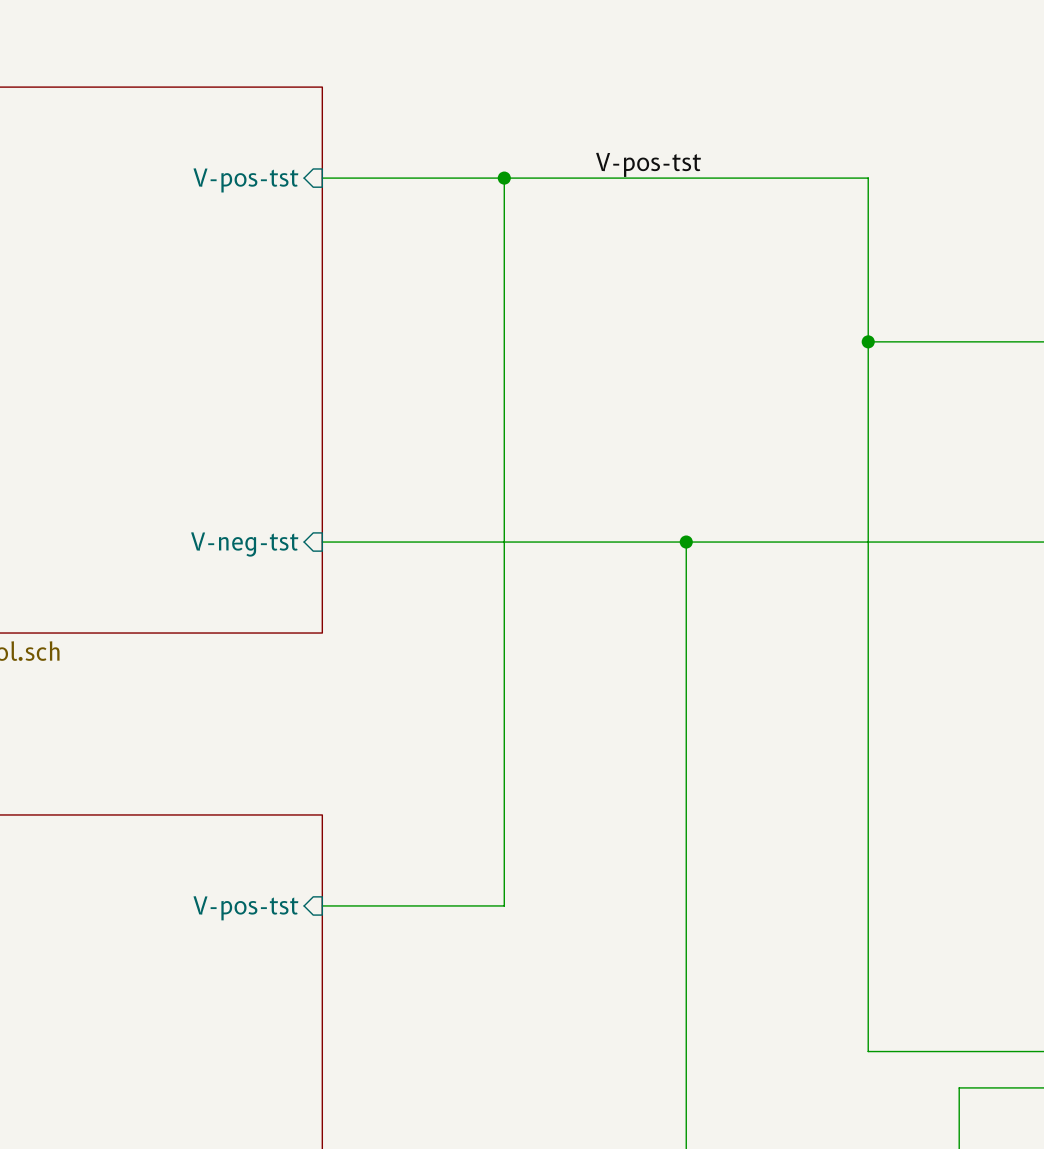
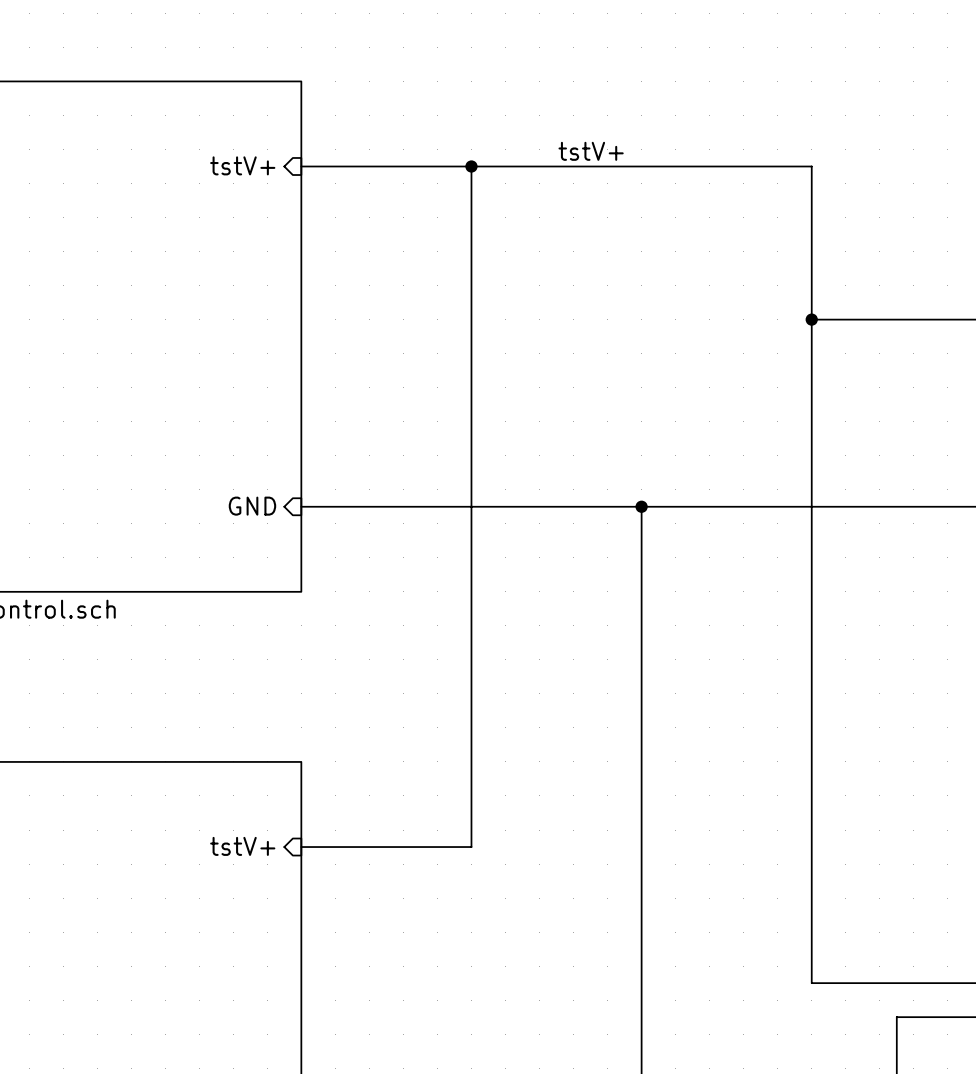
label: V-pos-tst (648, 164) -> tstV+ (591, 151)
sheet pin: V-pos-tst (245, 180) -> tstV+ (242, 165)
sheet pin: V-neg-tst (244, 544) -> GND (252, 506)
sheet pin: V-pos-tst (245, 908) -> tstV+ (242, 846)

